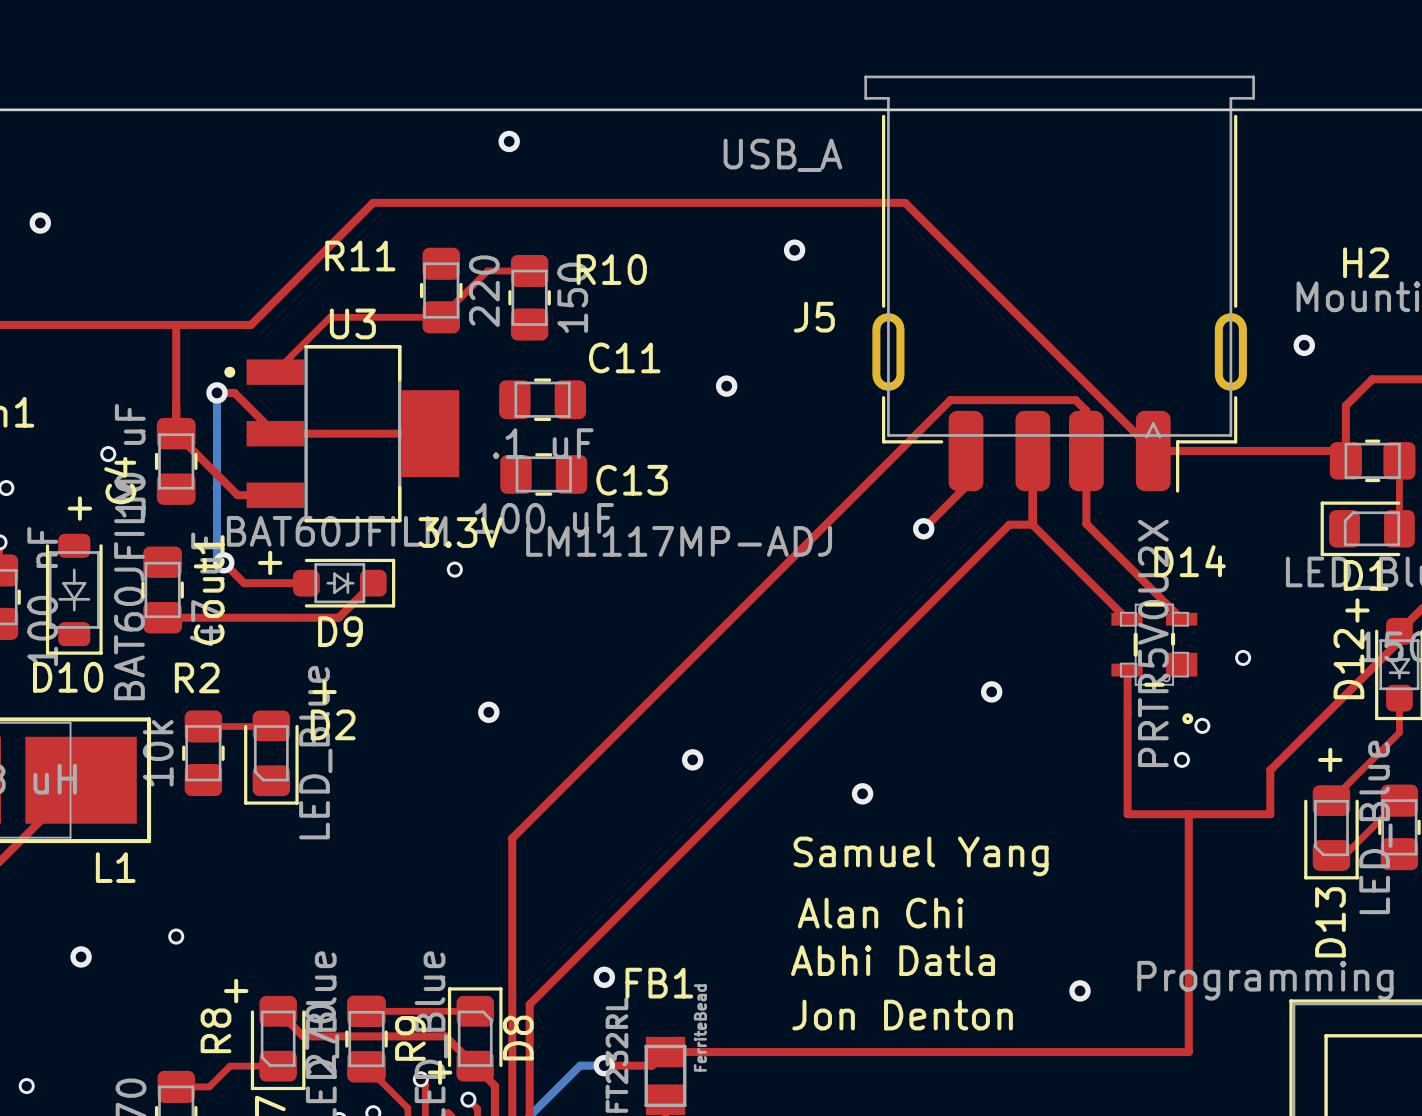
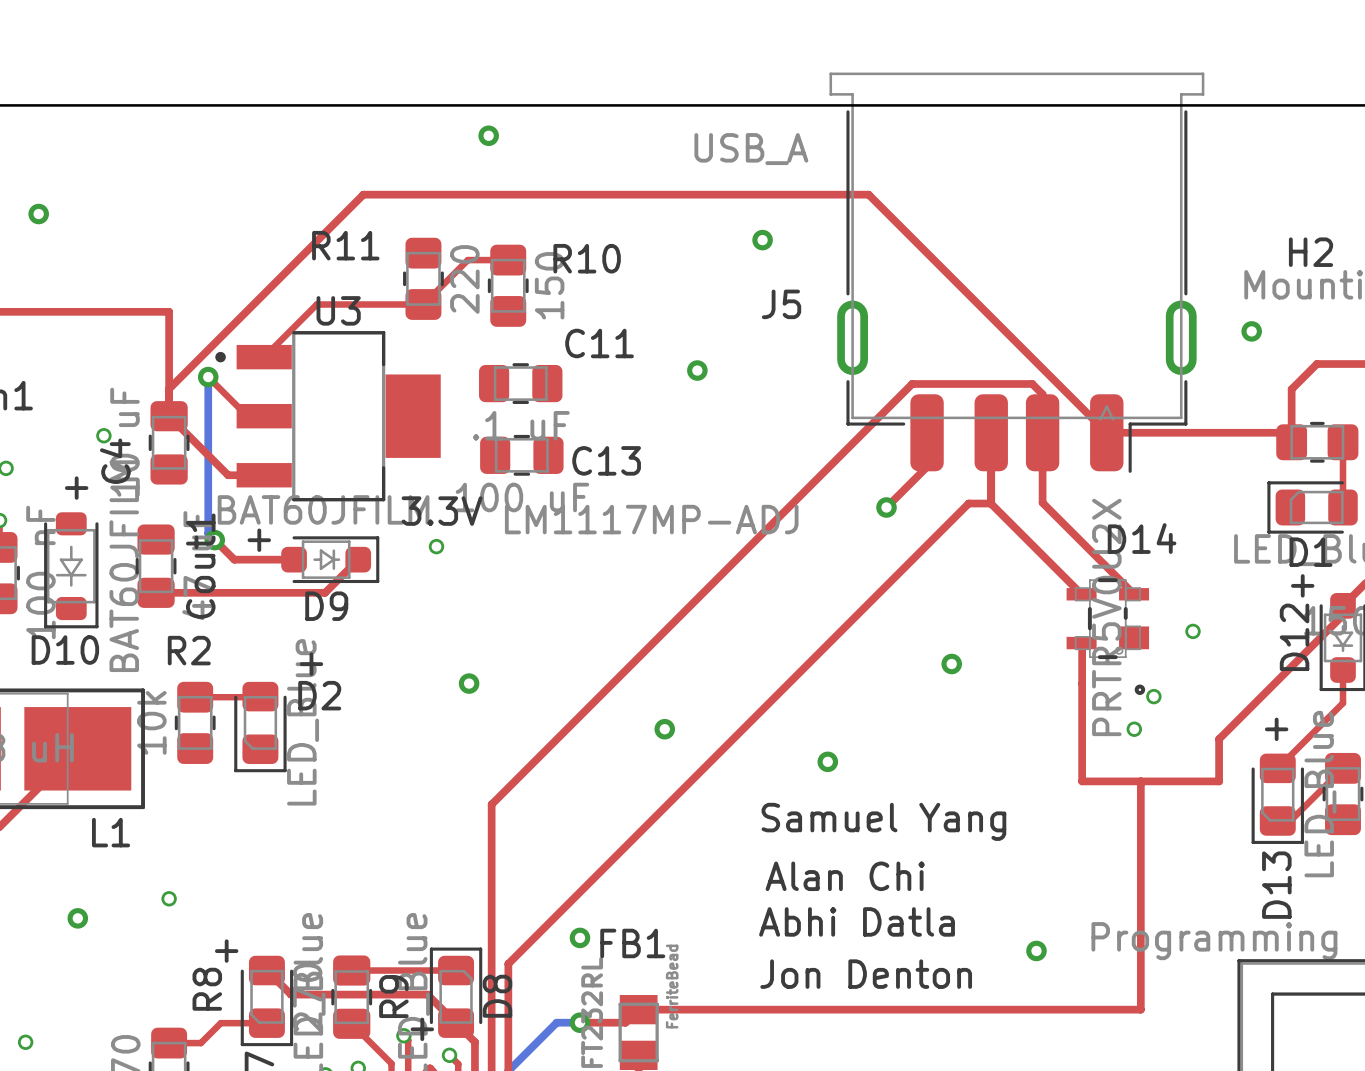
top track: (378, 202) (373, 202) (250, 324) (176, 324) -> (363, 194) (169, 388)
top track: (216, 392) (234, 392) (275, 433) (430, 433) -> (208, 377) (247, 416)

